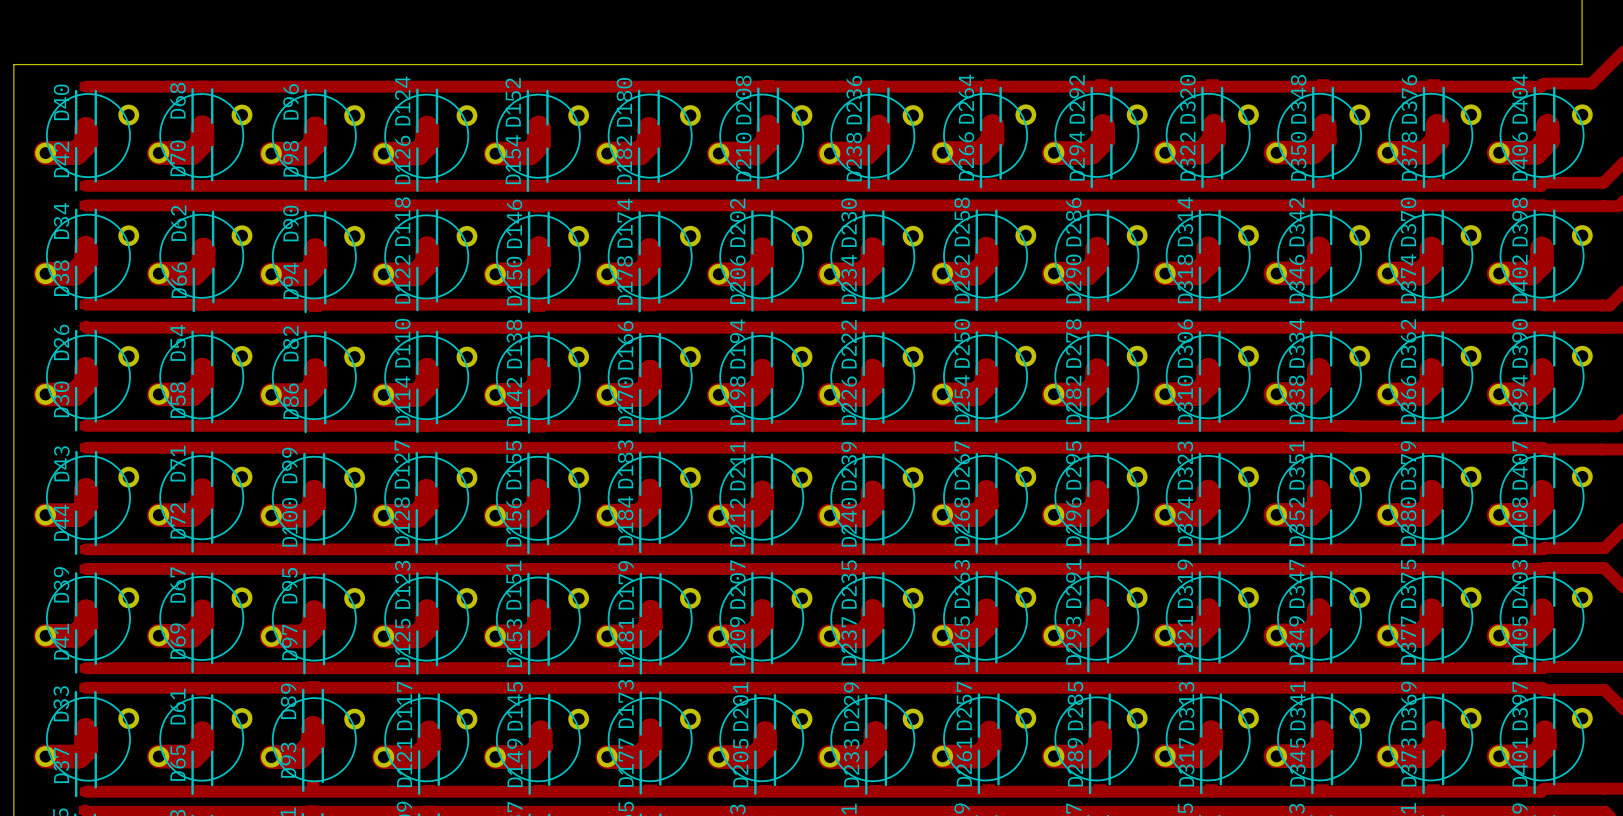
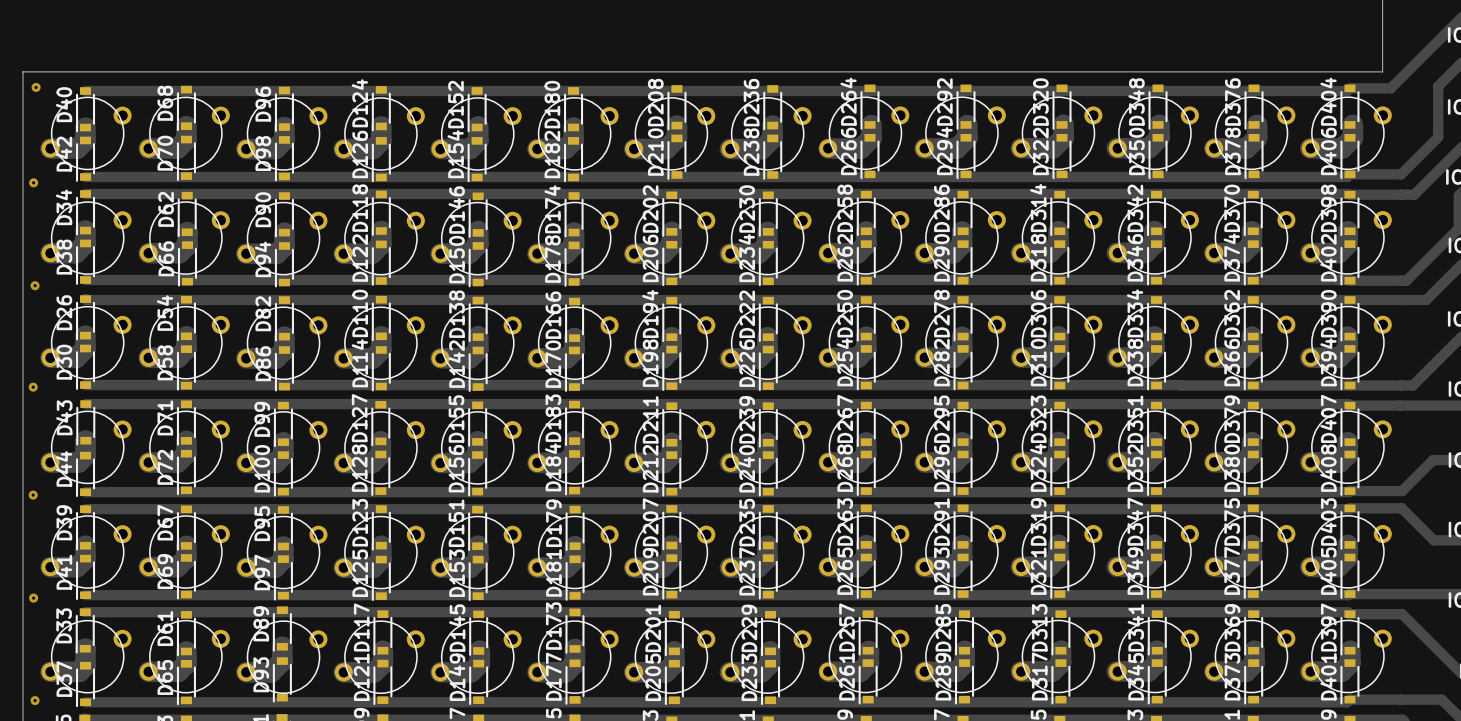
via: none -> (36, 87)
via: none -> (33, 182)
via: none -> (35, 285)
via: none -> (33, 387)
via: none -> (33, 495)
via: none -> (33, 598)
via: none -> (35, 700)

